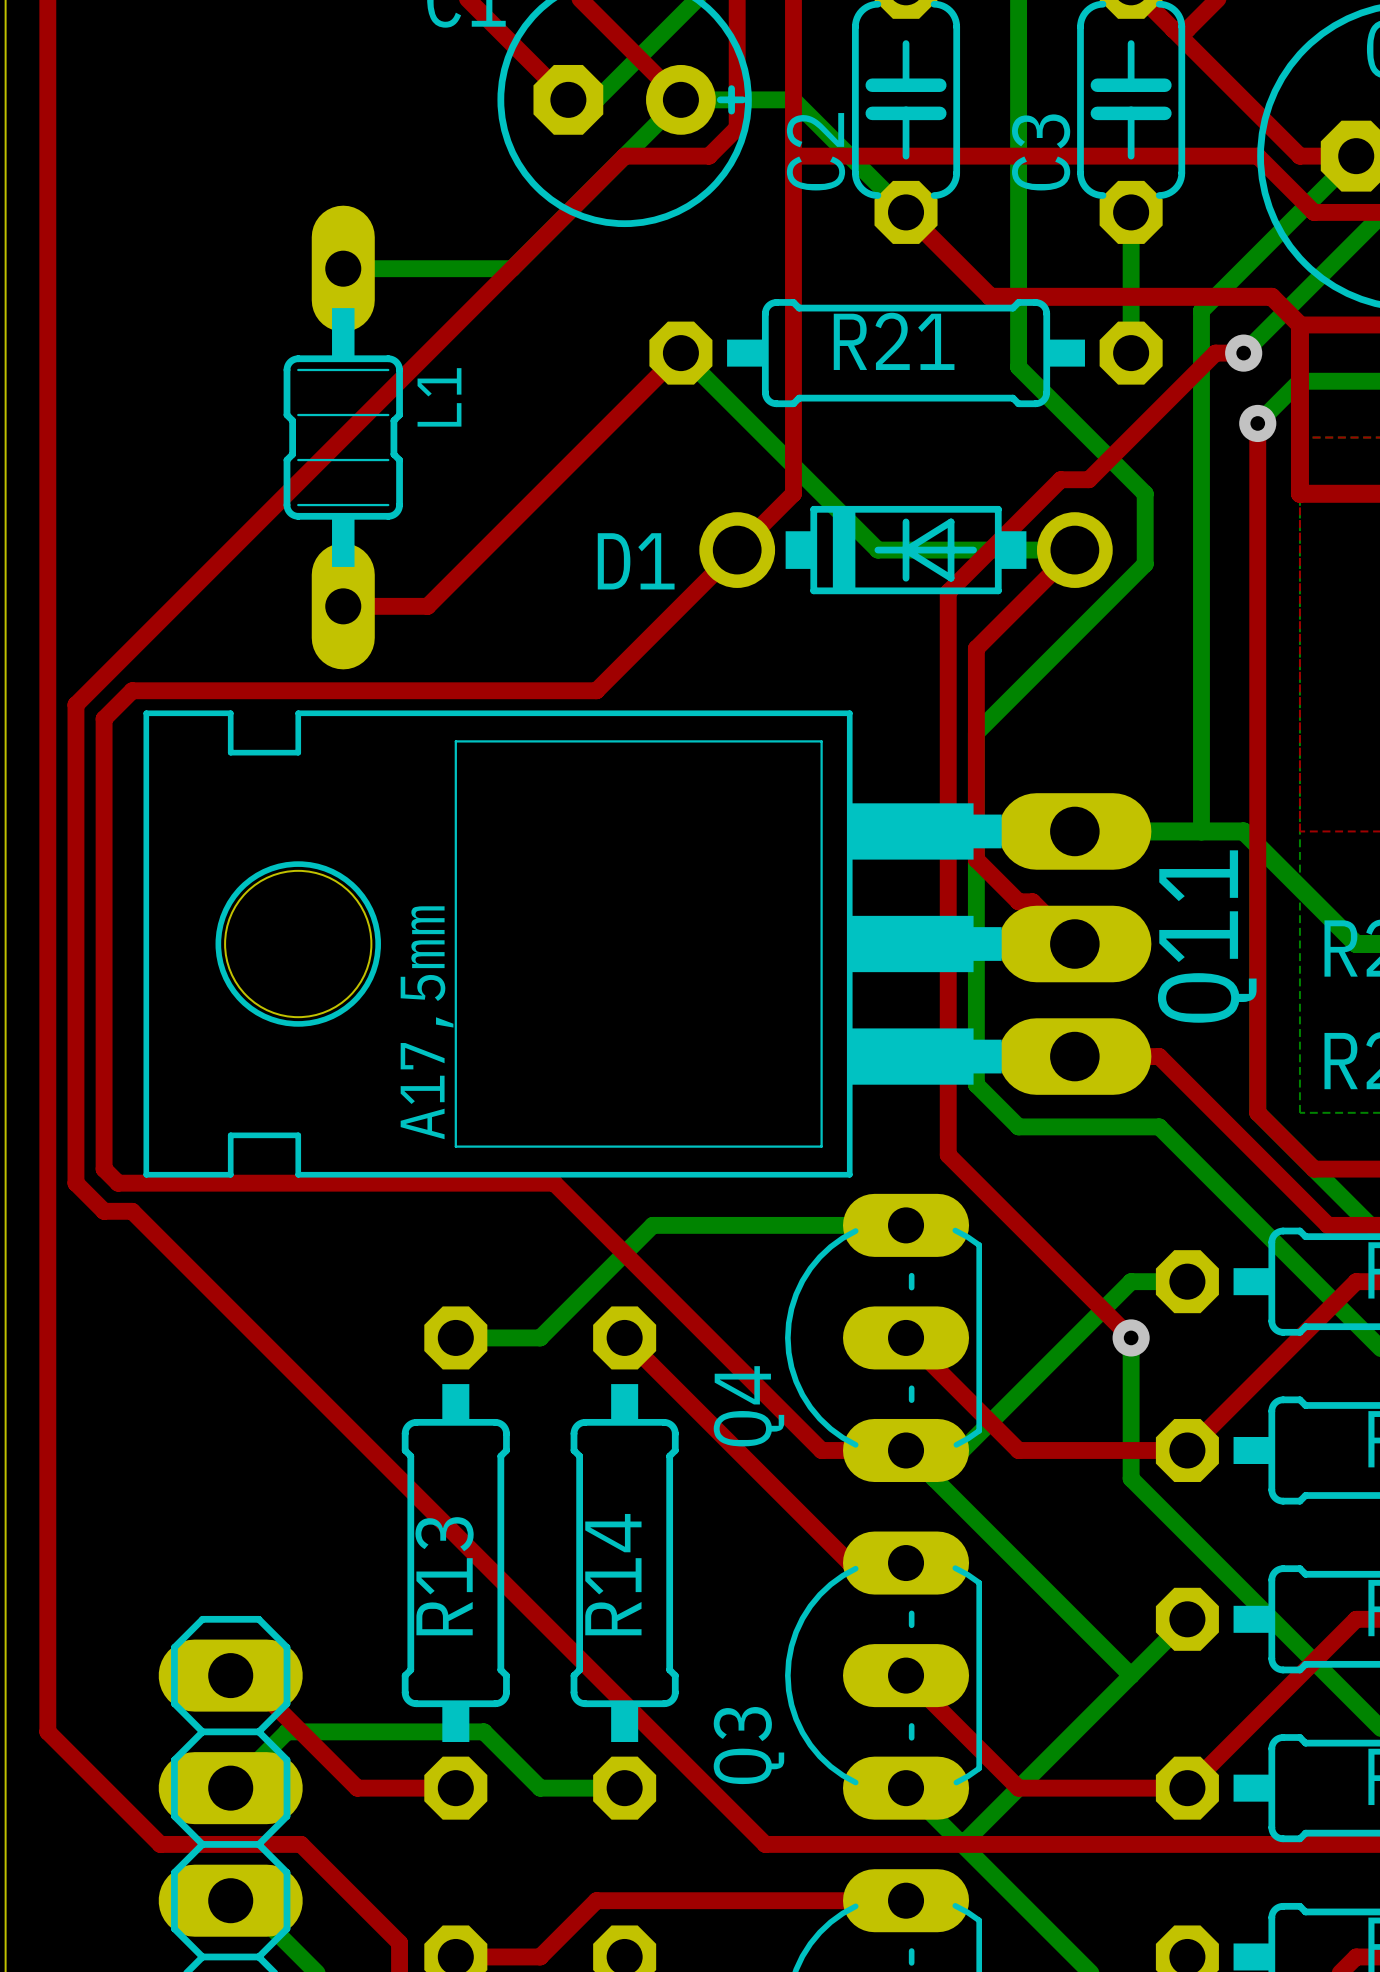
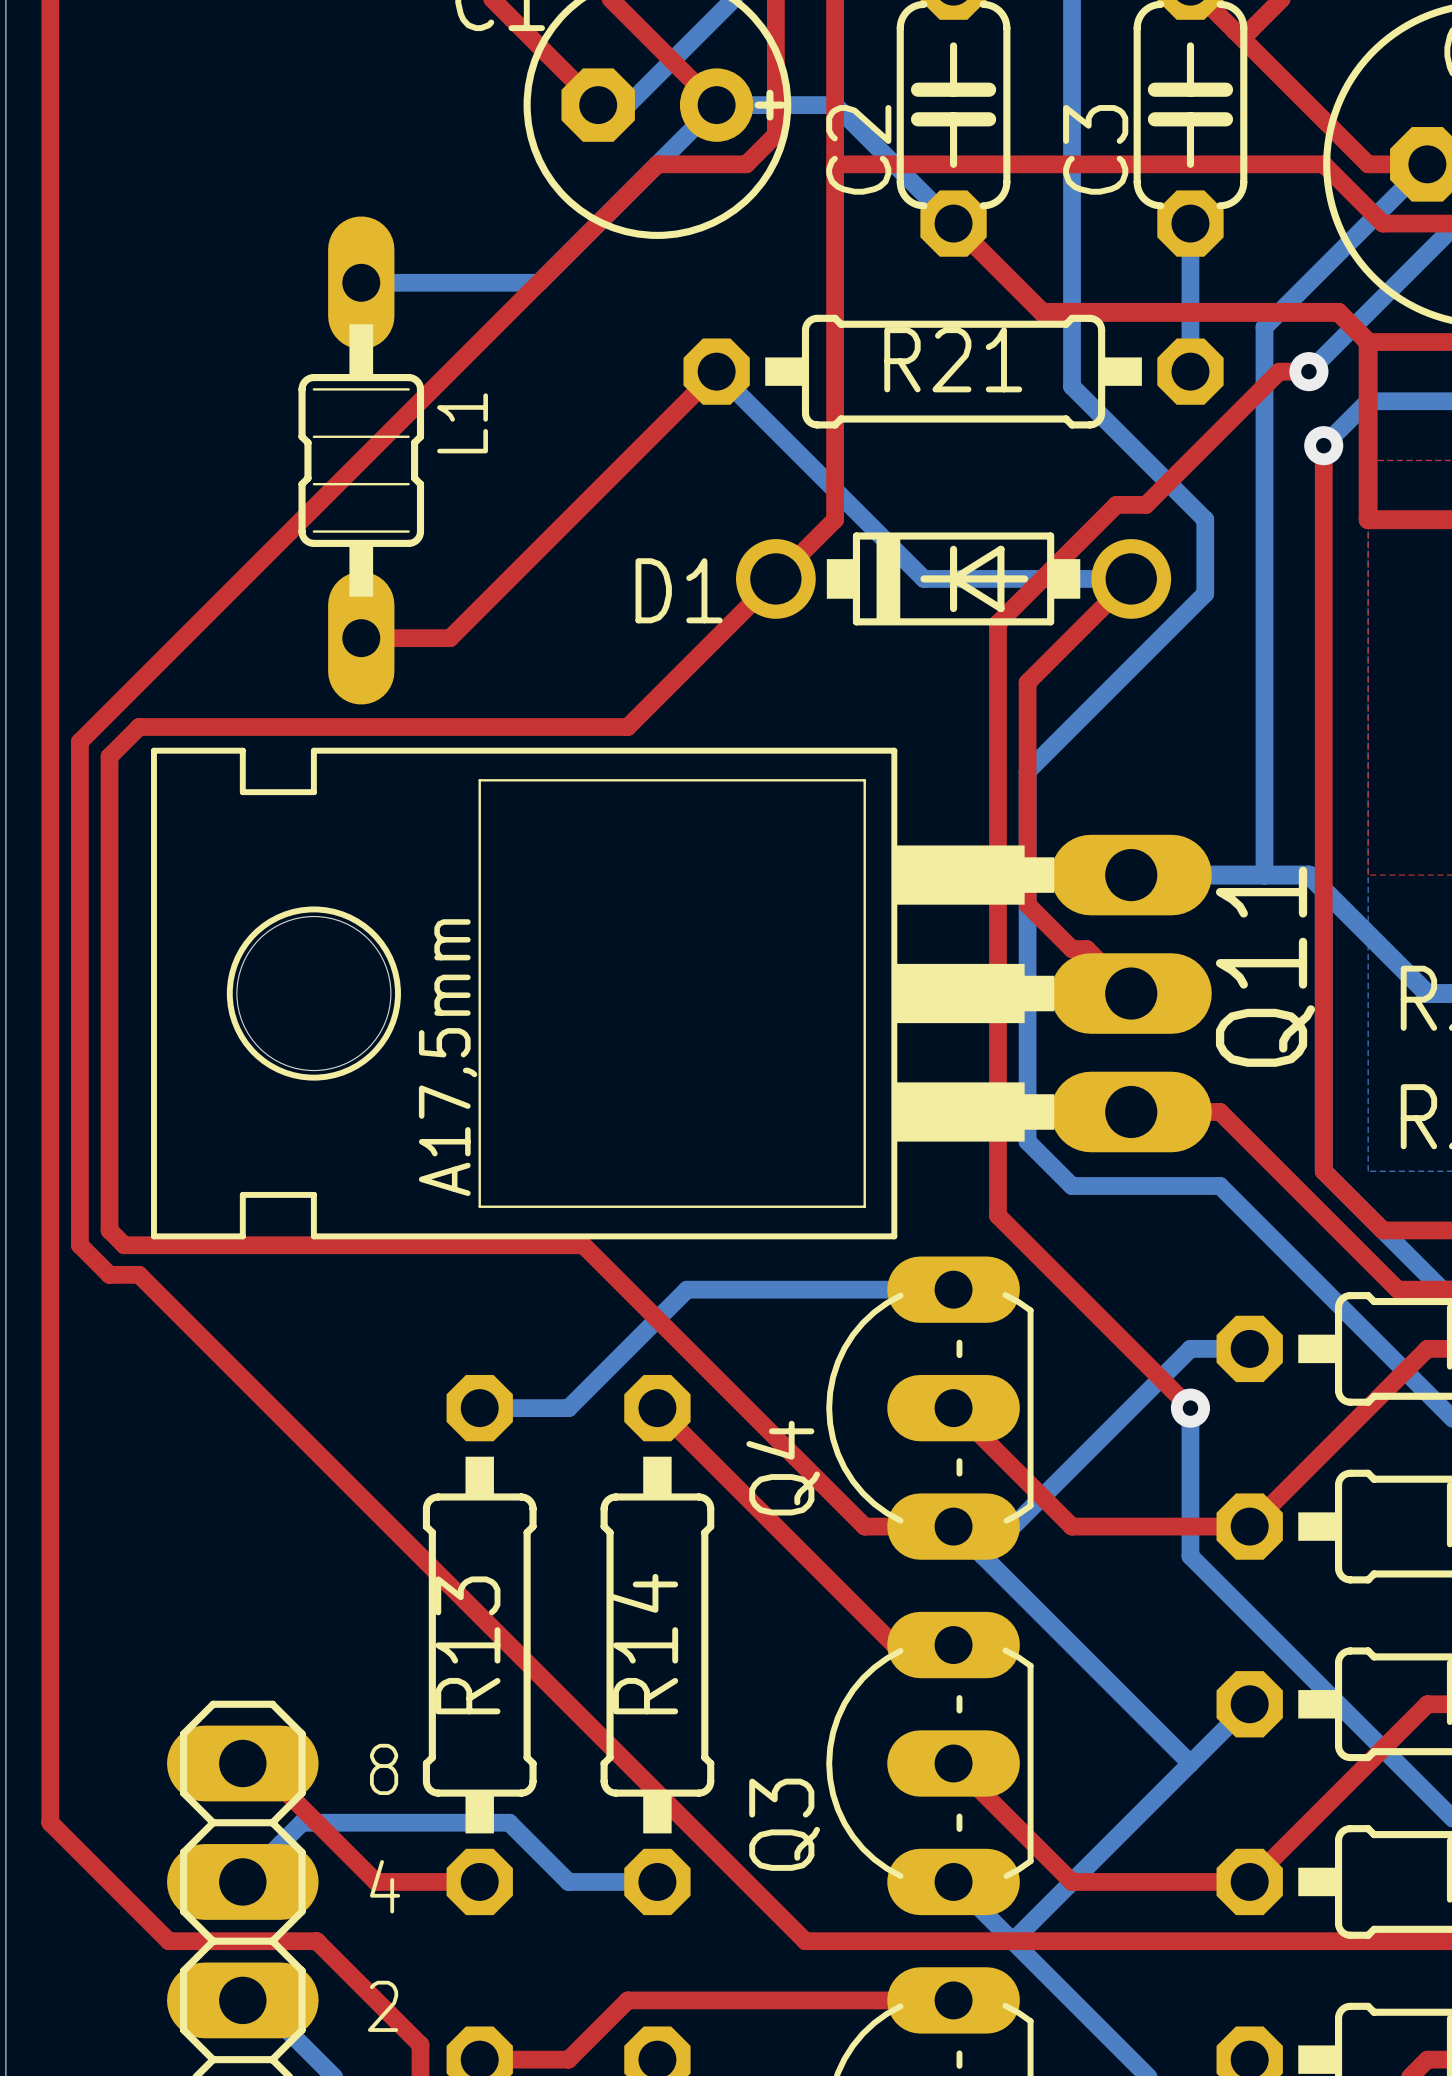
text: none -> 8 (384, 1769)
text: none -> 4 (385, 1886)
text: none -> 2 (383, 2006)

